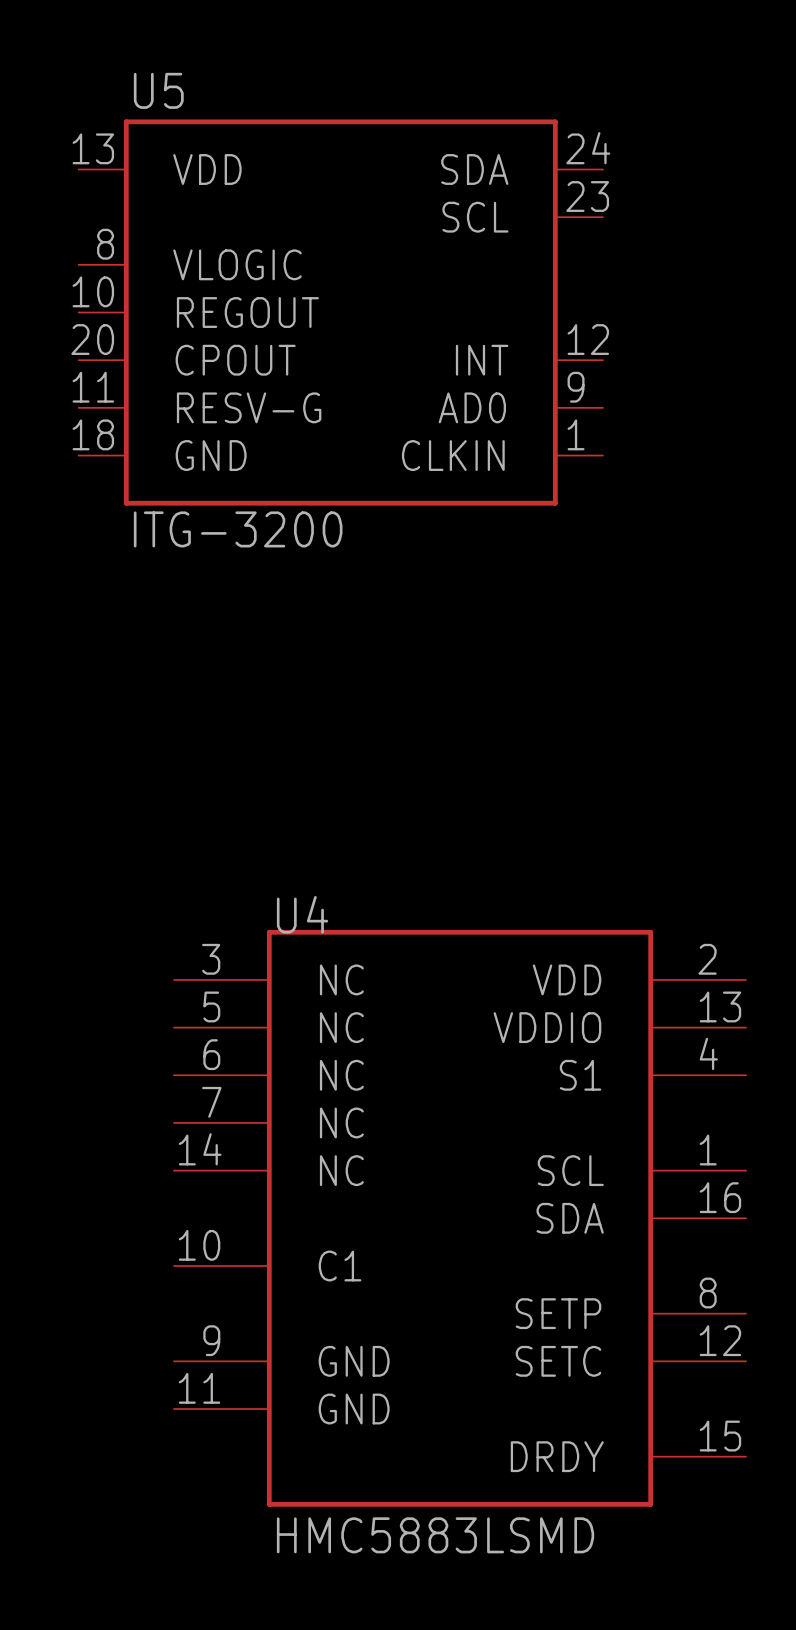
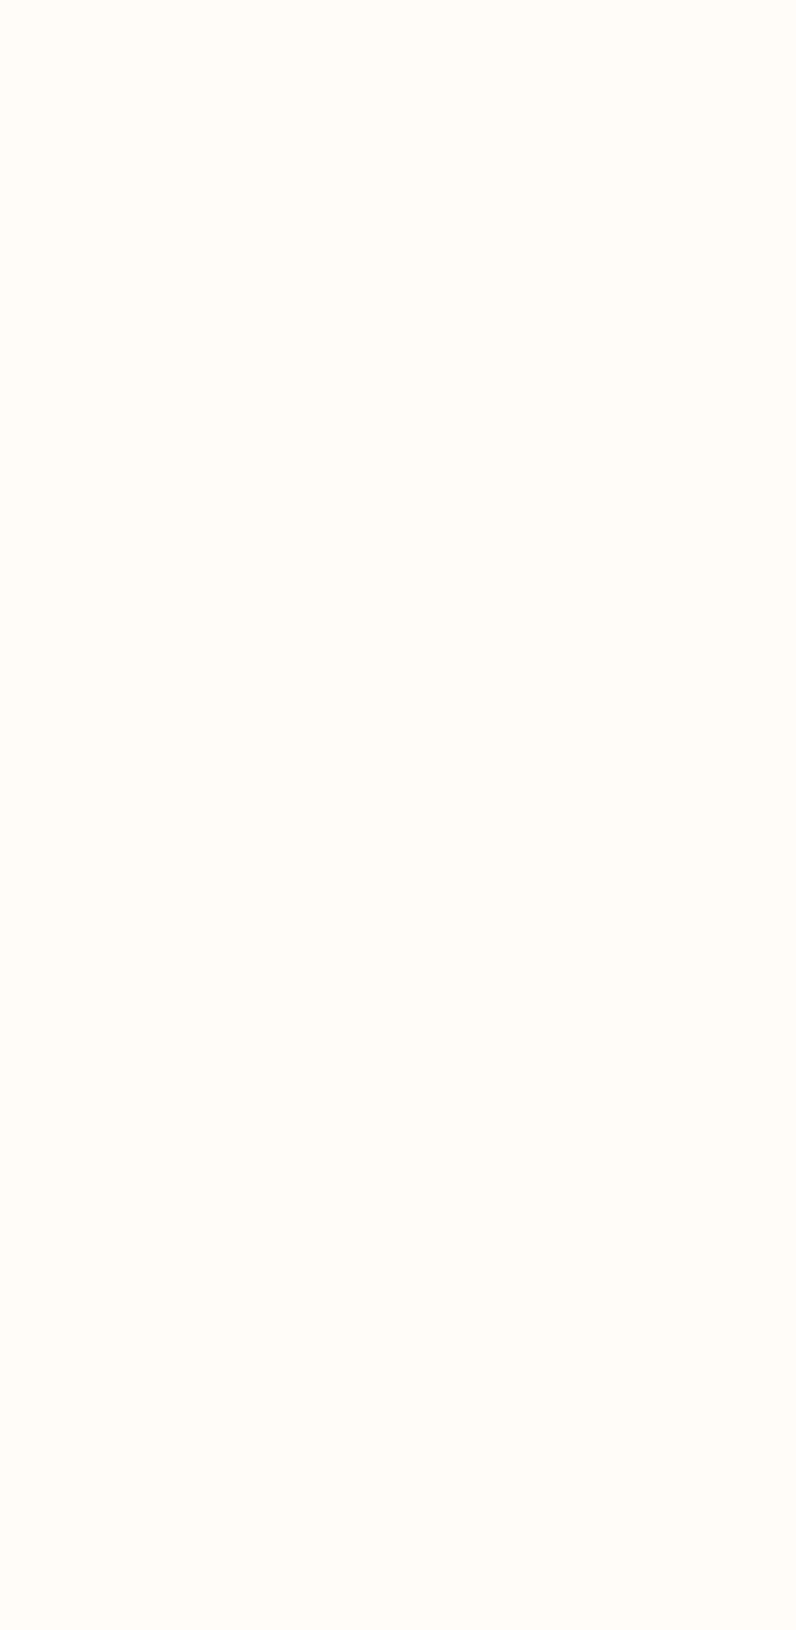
U5: ITG-3200 (340, 312) -> none
U4: HMC5883LSMD (459, 1218) -> none

